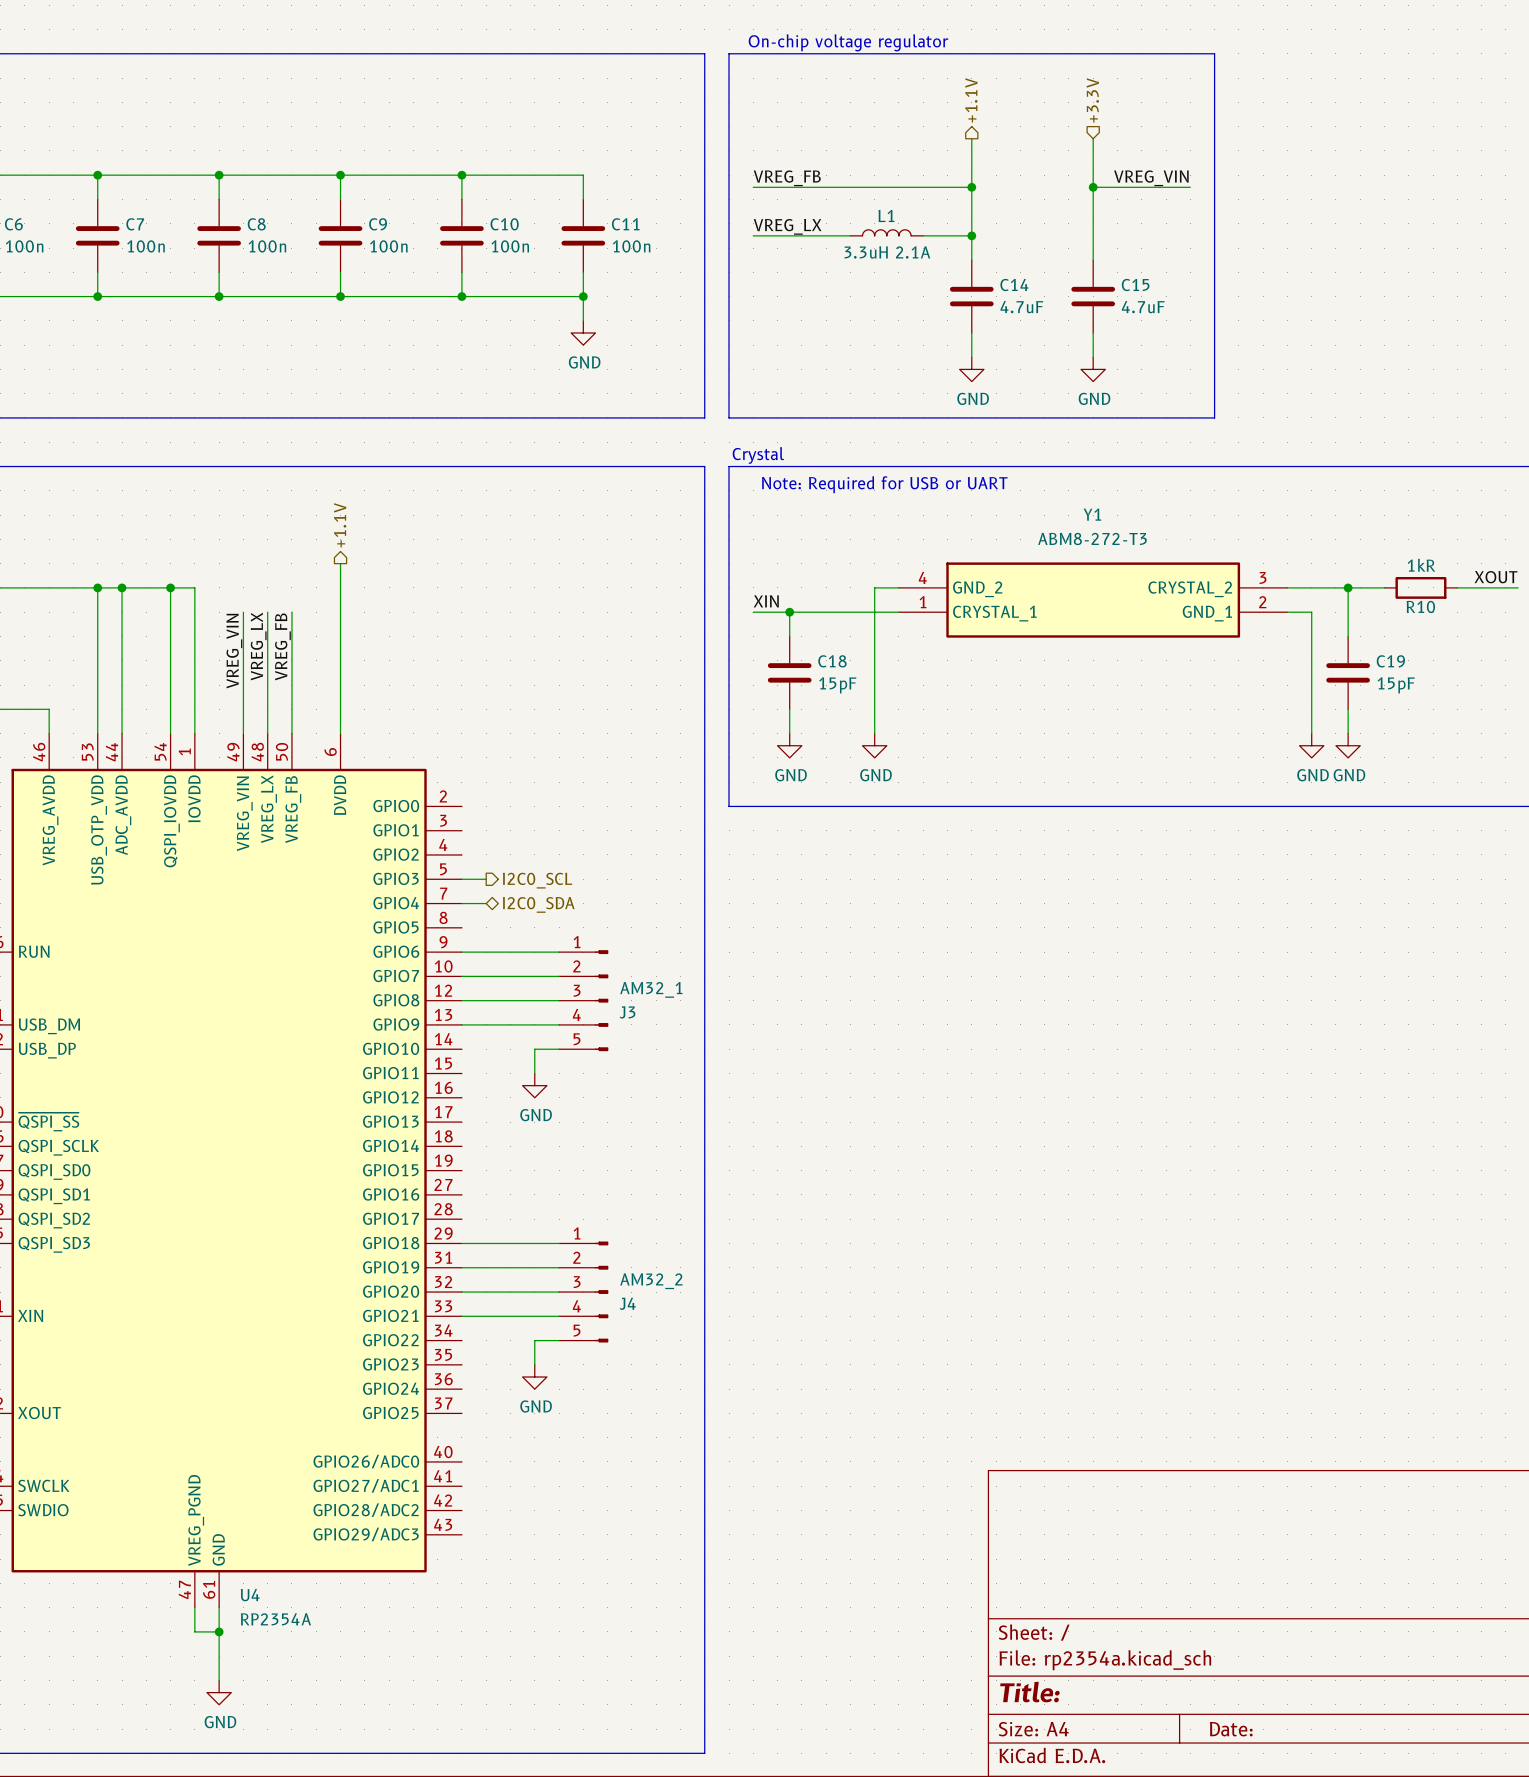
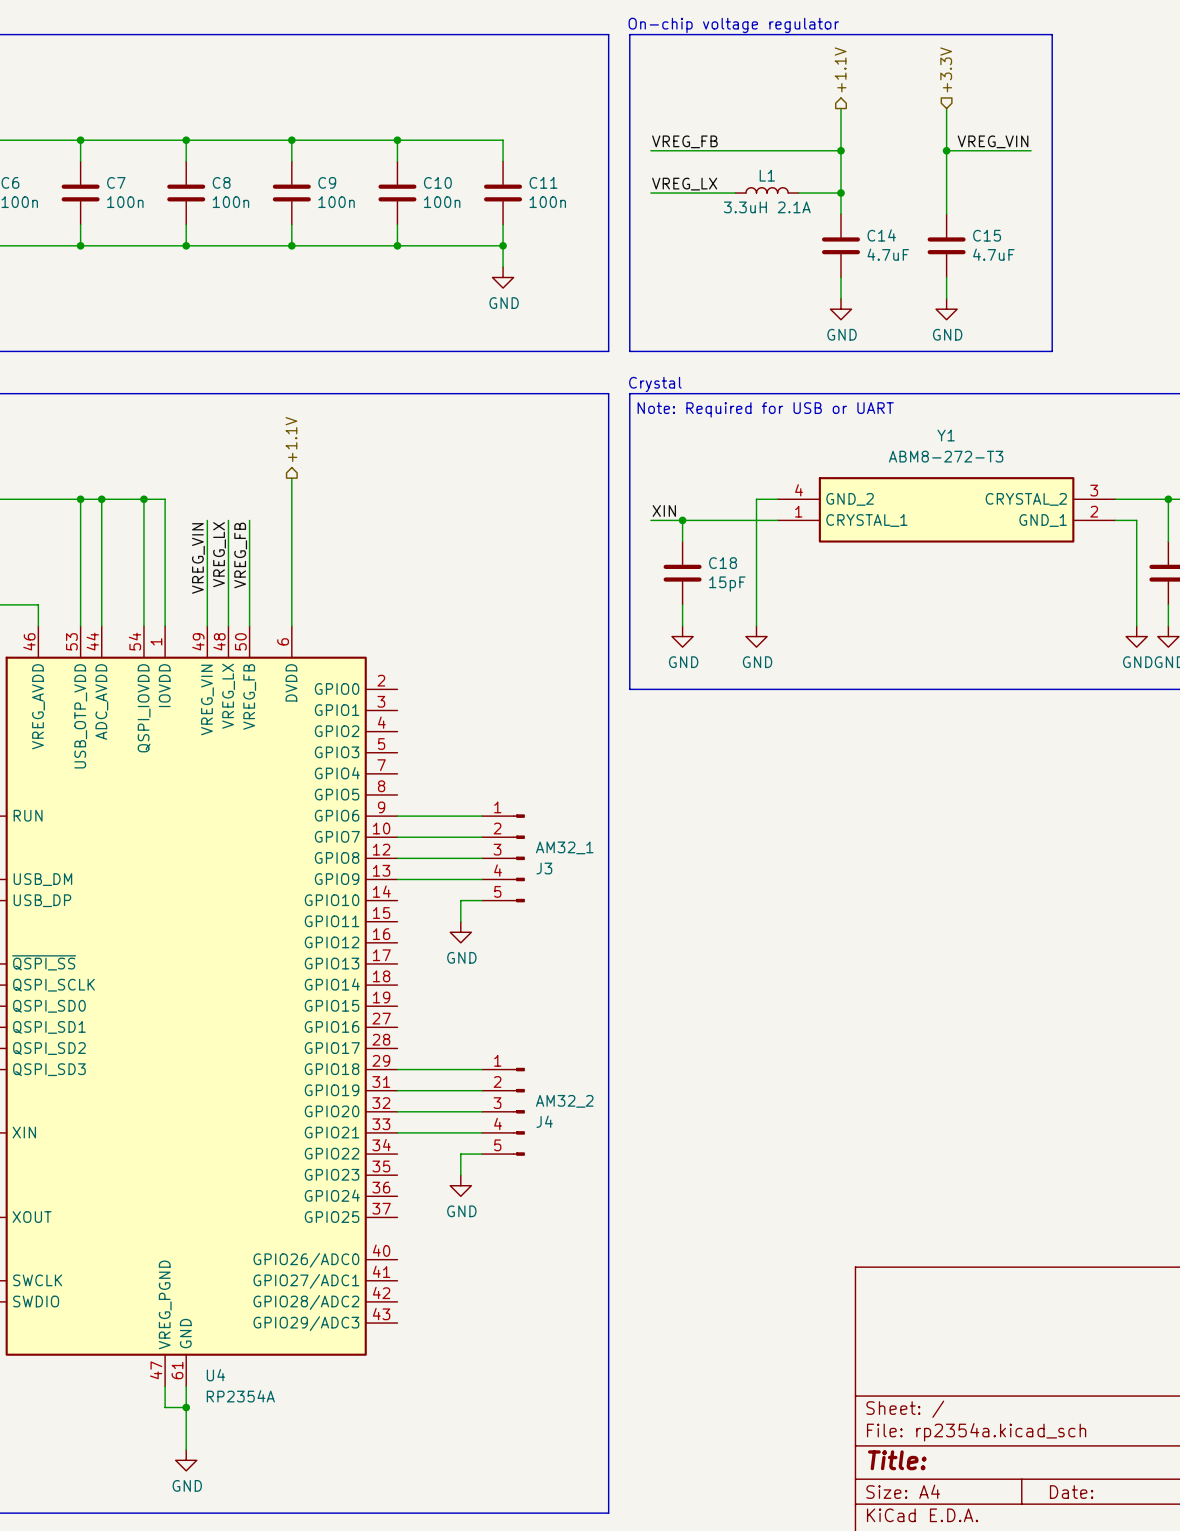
wire: (461, 879) (486, 879) -> none
hierarchical label: I2C0_SCL (537, 880) -> none
wire: (461, 903) (486, 903) -> none
hierarchical label: I2C0_SDA (538, 904) -> none

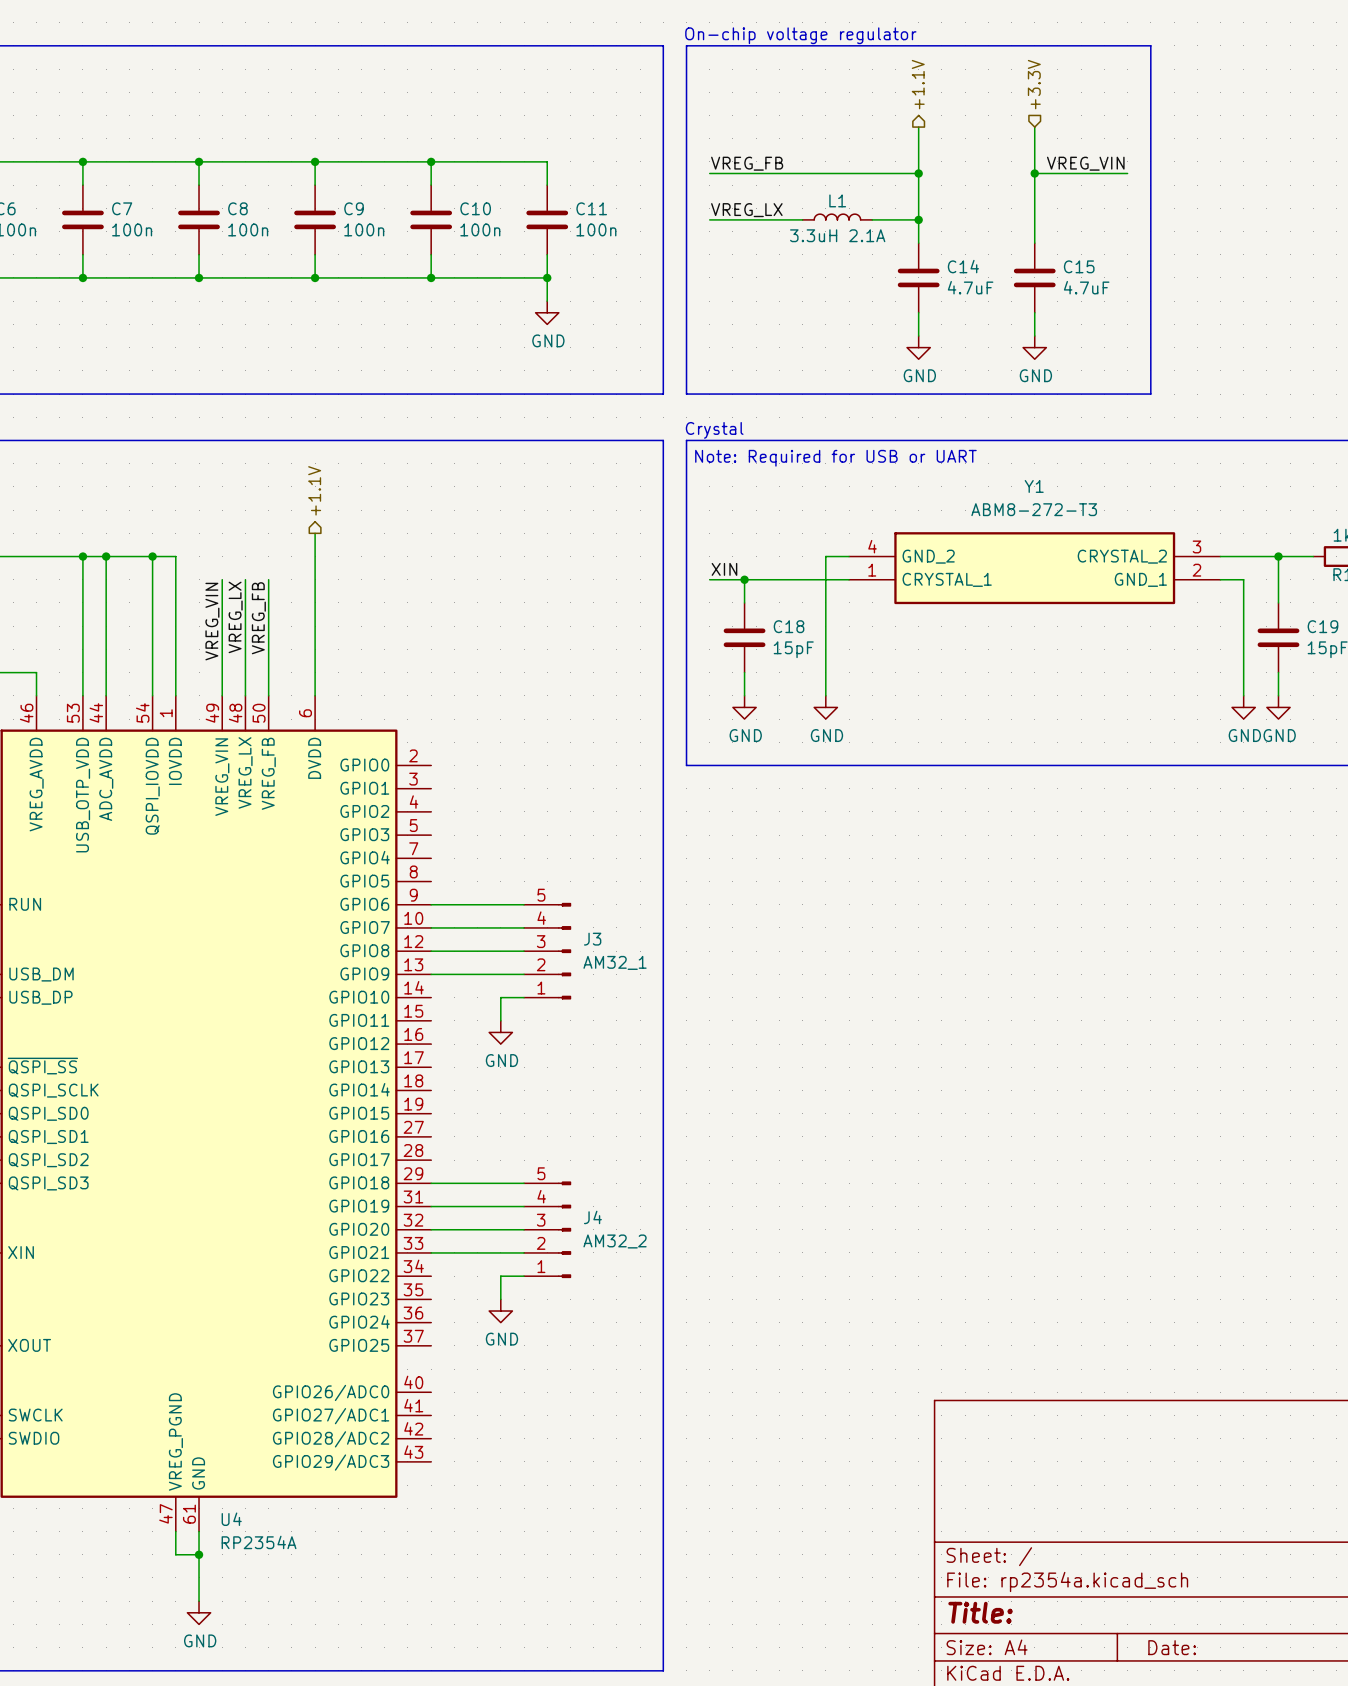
J3 flip: as is (518, 858) -> up-down (564, 951)
J4 flip: as is (518, 1111) -> up-down (564, 1229)

